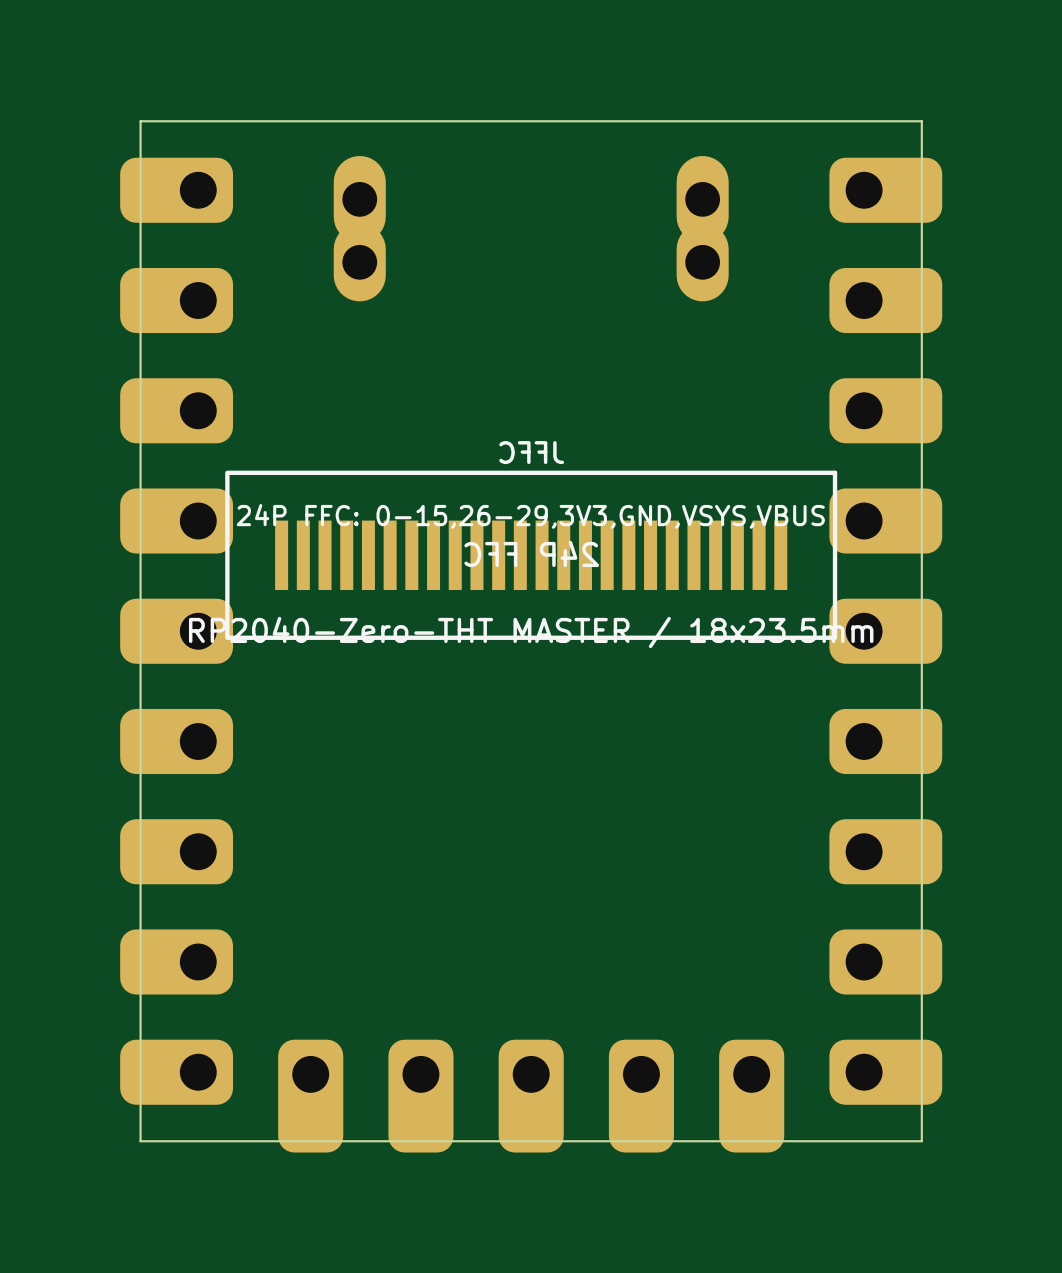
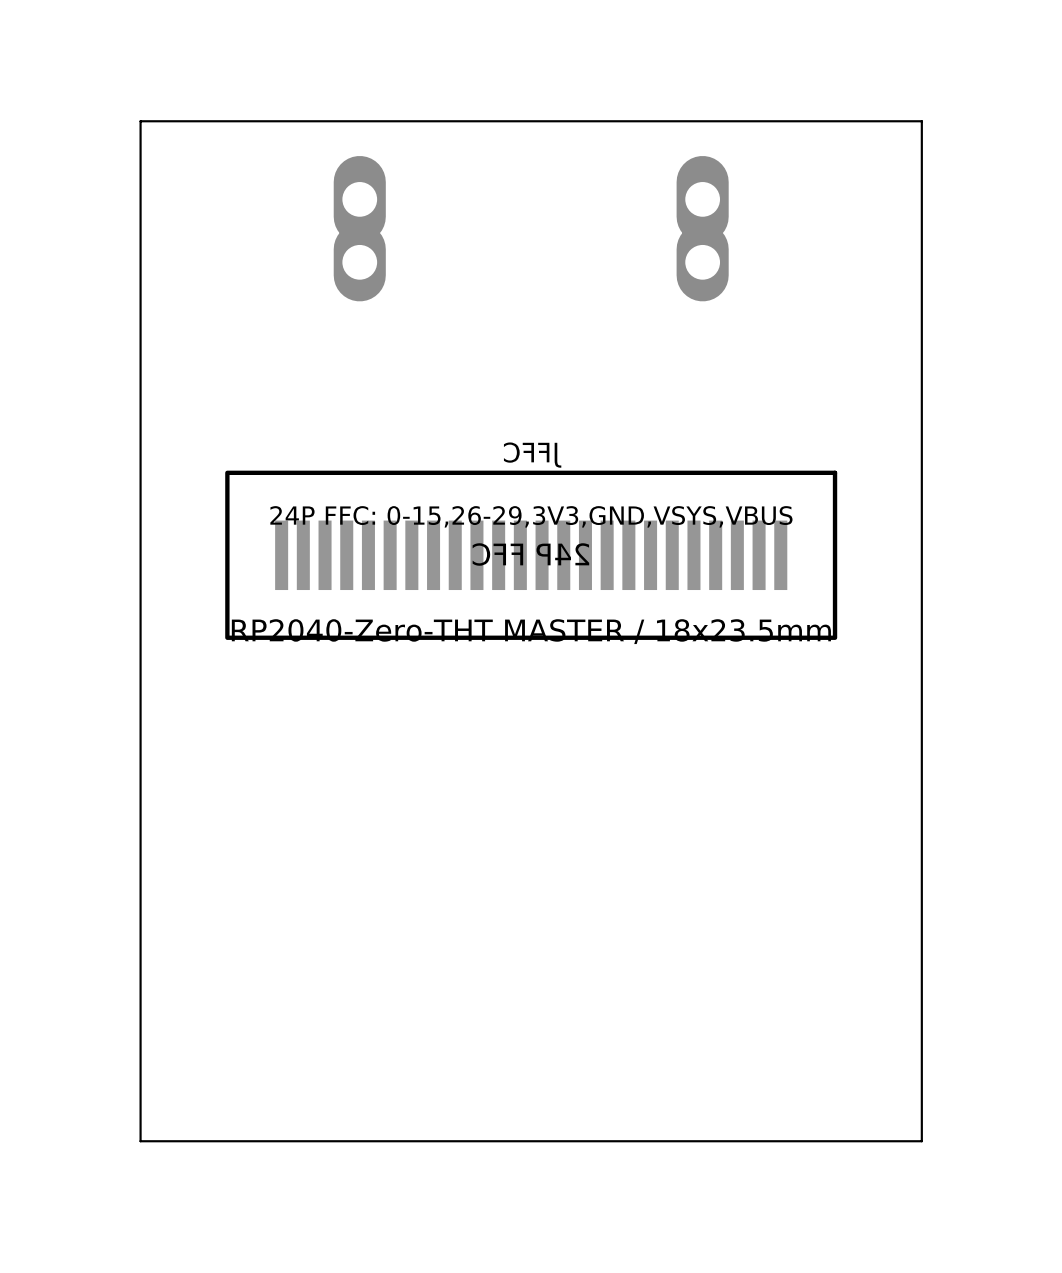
part: (531, 655) -> none

